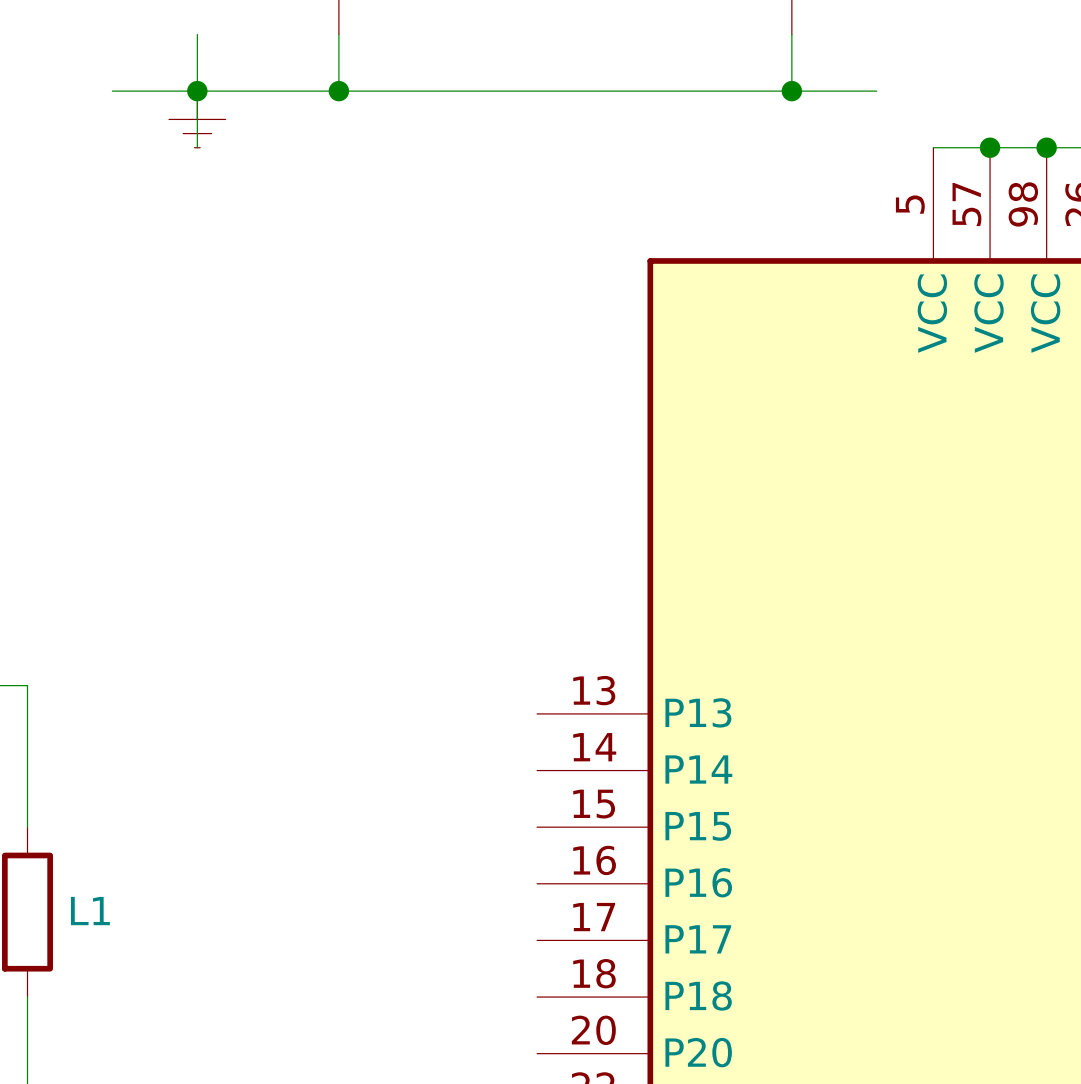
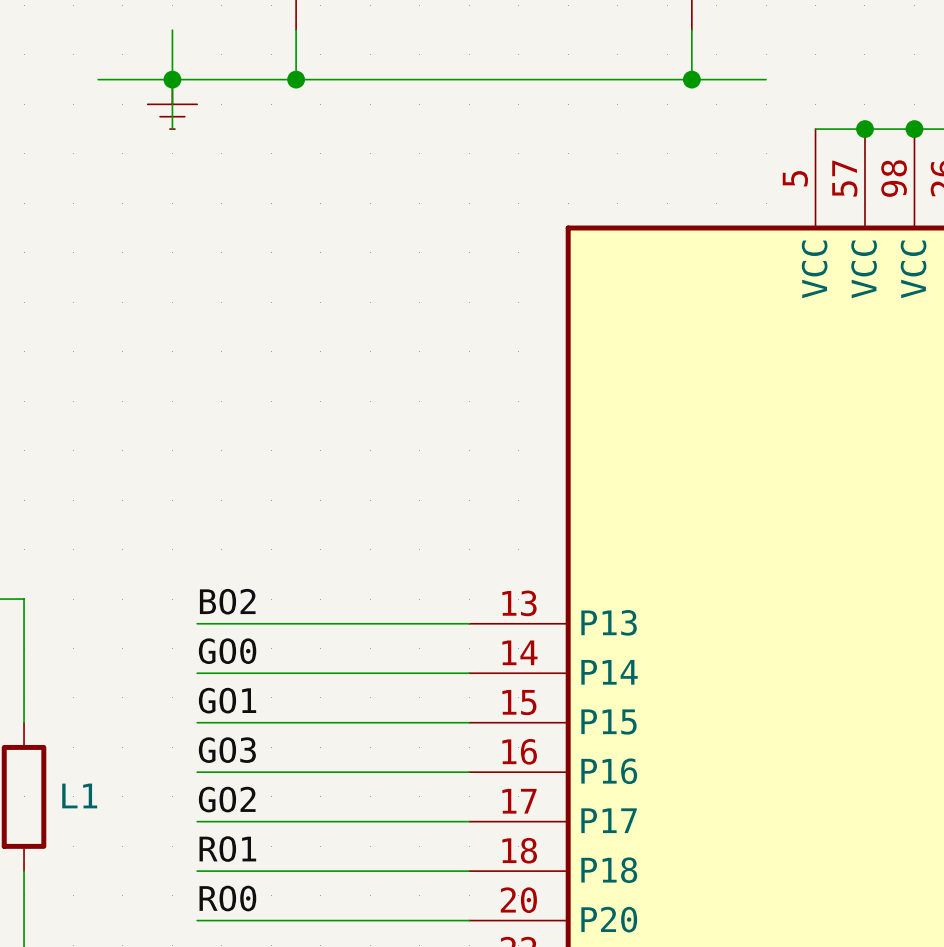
label: none -> BO2 (227, 601)
wire: none -> (197, 623) (469, 623)
label: none -> GO0 (227, 651)
wire: none -> (197, 673) (469, 673)
label: none -> GO1 (227, 700)
wire: none -> (197, 722) (469, 722)
label: none -> GO3 (227, 750)
wire: none -> (197, 772) (469, 772)
label: none -> GO2 (227, 799)
wire: none -> (197, 821) (469, 821)
label: none -> RO1 (227, 849)
wire: none -> (197, 871) (469, 871)
label: none -> RO0 (227, 898)
wire: none -> (197, 920) (469, 920)

